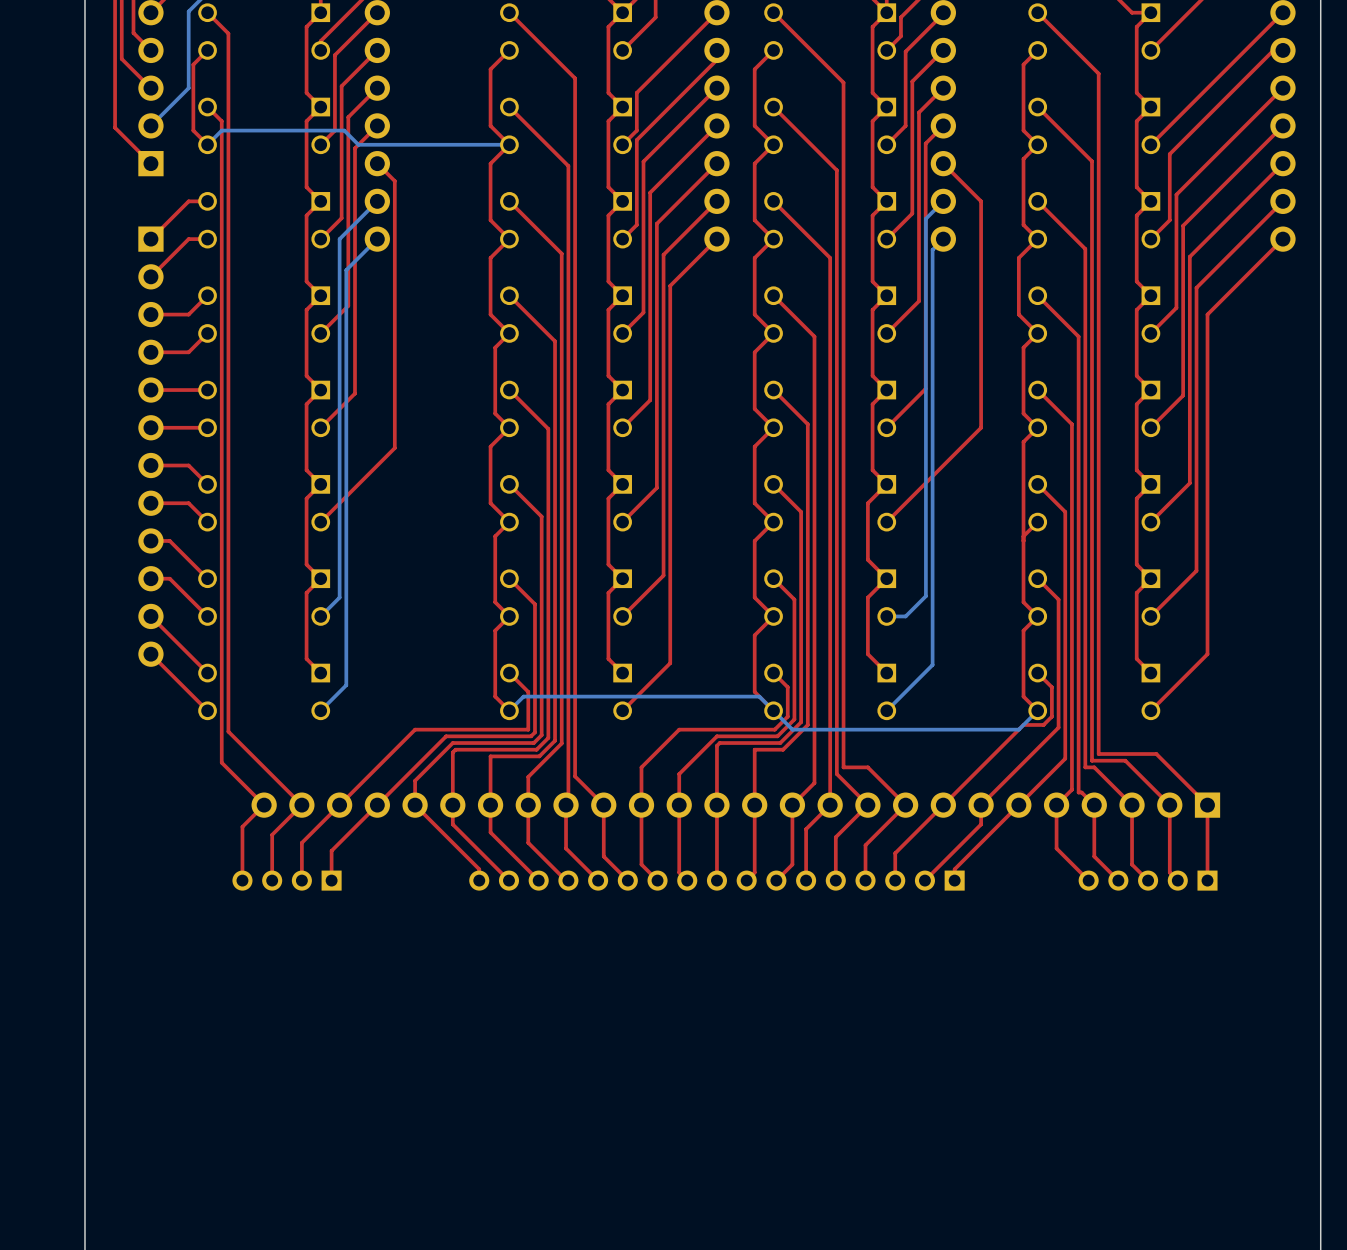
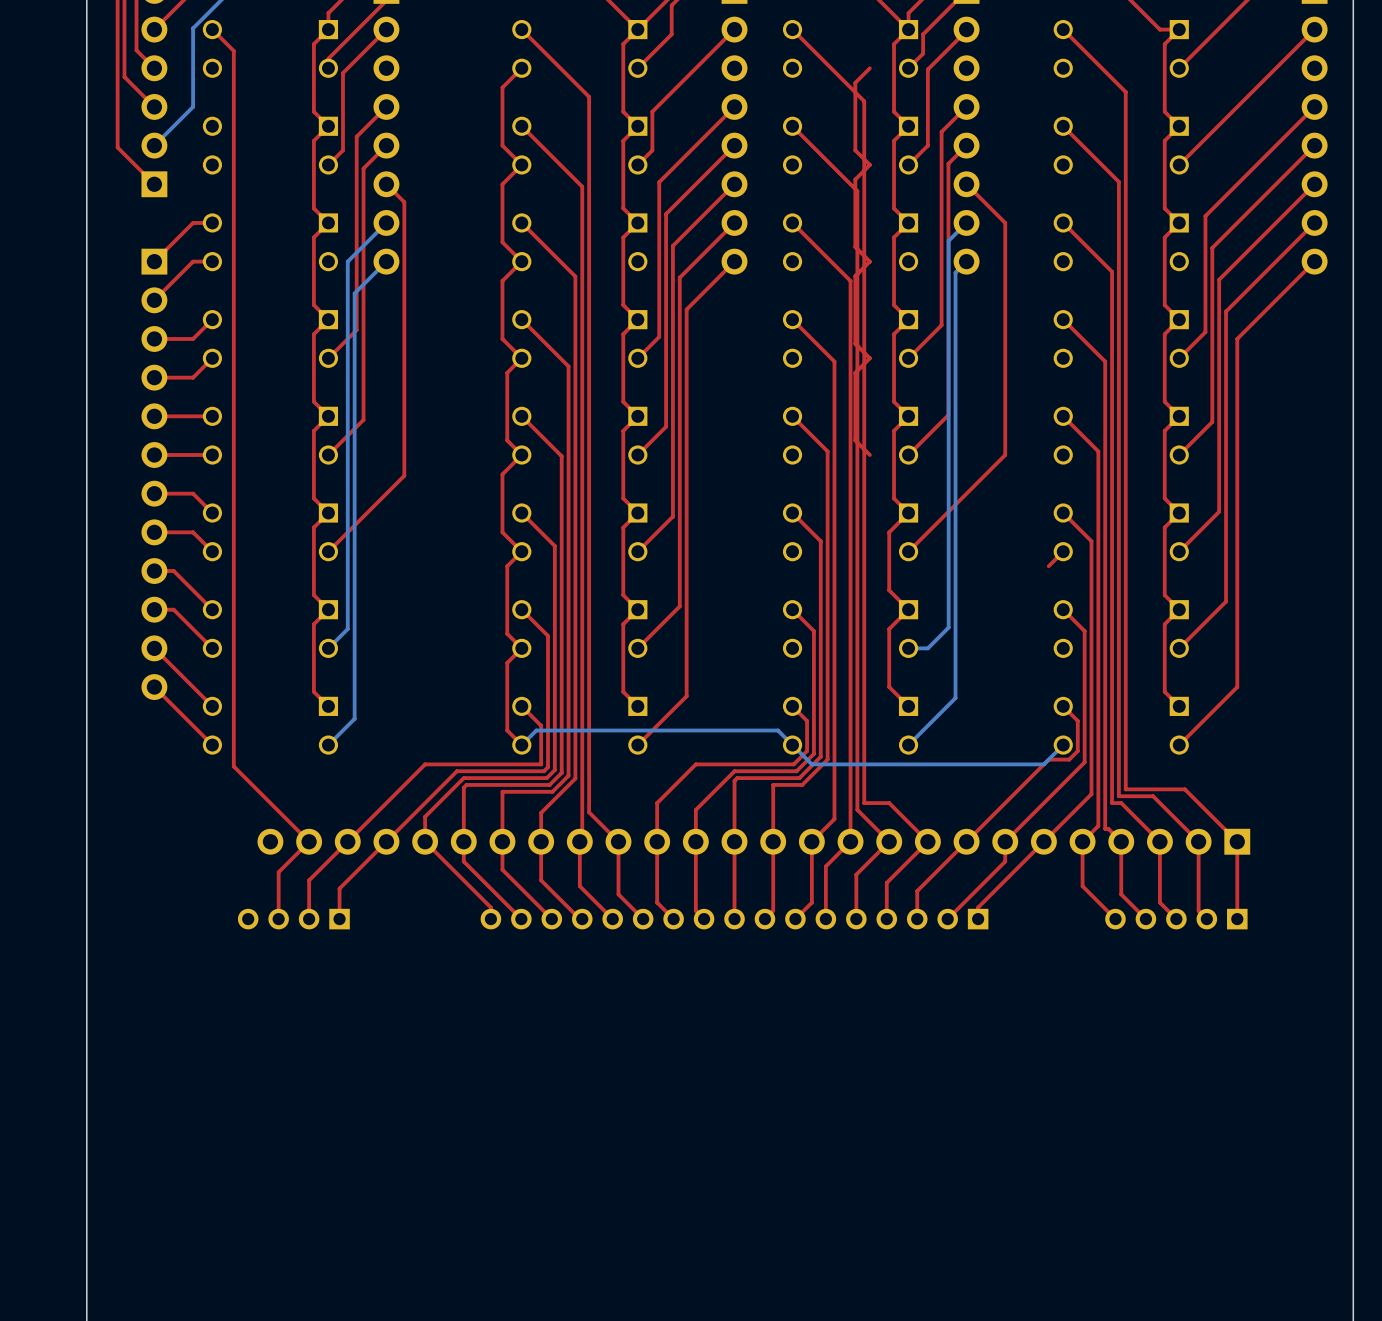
top track: (207, 50) (193, 64) (193, 130) (207, 144) -> none
top track: (377, 50) (341, 86) (341, 218) (320, 239) -> none
top track: (716, 50) (716, 59) (636, 140) (636, 224) (622, 239) -> none
top track: (773, 50) (754, 69) (754, 125) (773, 144) (754, 163) (754, 220) (773, 239) (754, 257) (754, 314) (773, 333) (754, 352) (754, 408) (773, 427) (754, 446) (754, 503) (773, 522) (754, 540) (754, 597) (773, 616) (754, 635) (754, 691) (773, 710) -> none
top track: none -> (869, 68) (855, 82) (855, 150) (869, 164) (855, 179) (855, 247) (869, 261) (855, 276) (855, 343) (869, 358) (855, 372) (855, 440) (869, 455)
top track: (943, 50) (912, 81) (912, 213) (886, 239) -> none
top track: (1037, 50) (1023, 64) (1023, 130) (1037, 144) (1023, 158) (1023, 224) (1037, 239) (1018, 257) (1018, 314) (1037, 333) (1023, 347) (1023, 413) (1037, 427) (1023, 441) (1023, 602) (1037, 616) (1023, 630) (1023, 696) (1037, 710) -> none
top track: (1282, 50) (1273, 50) (1169, 154) (1169, 220) (1150, 239) -> none
top track: (207, 107) (221, 121) (221, 762) (264, 805) (242, 826) (242, 880) -> none
bottom track: (509, 144) (358, 144) (344, 130) (221, 130) (207, 144) -> none

